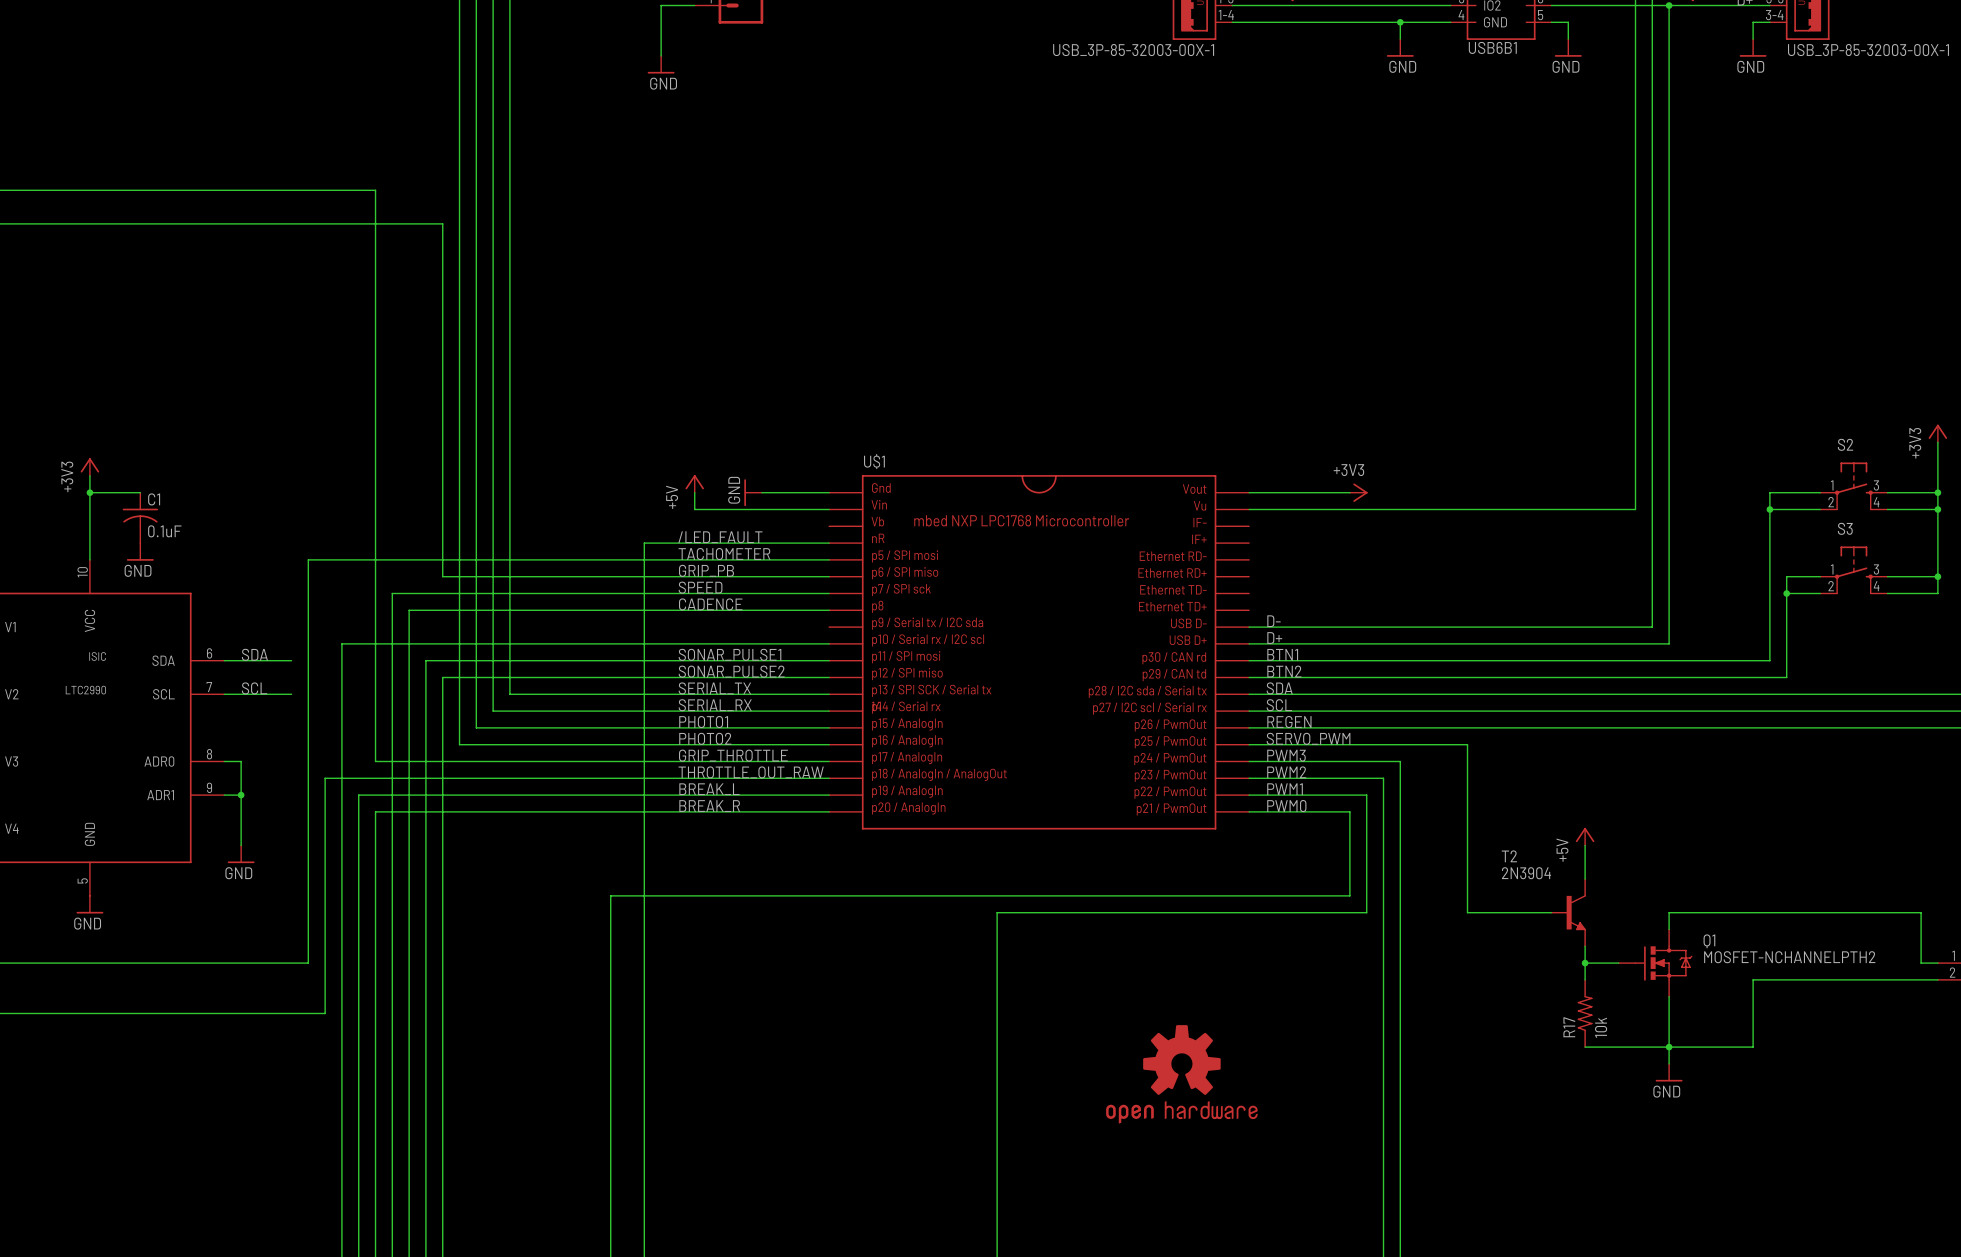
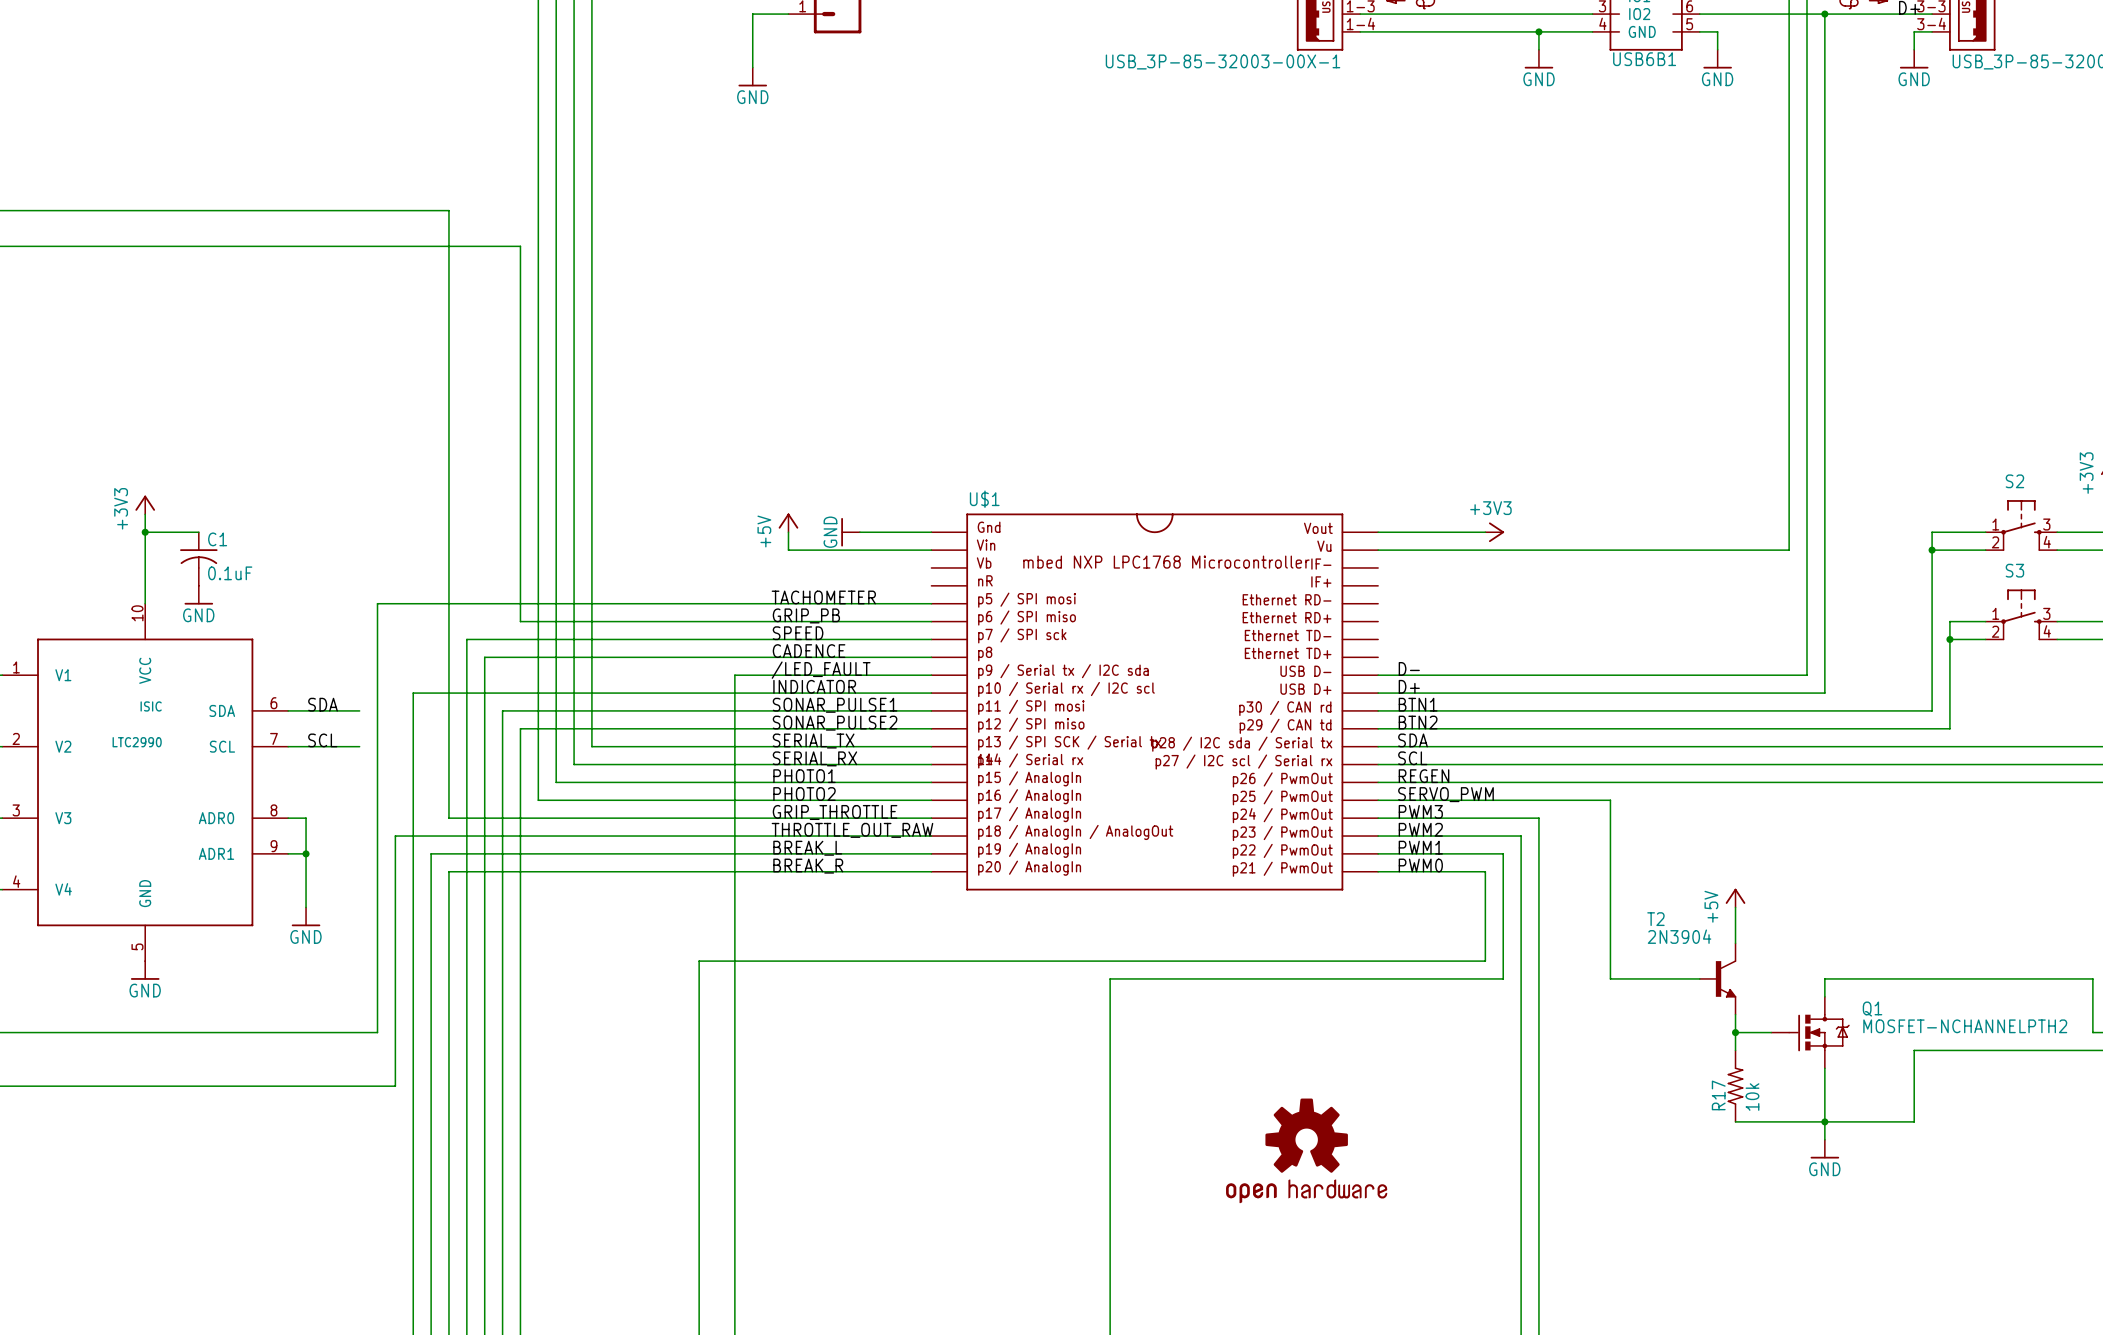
label position: /LED_FAULT (720, 537) -> /LED_FAULT (821, 670)
wire: (829, 543) (644, 543) (644, 627) -> (931, 675) (734, 675)
label: none -> INDICATOR (814, 686)

